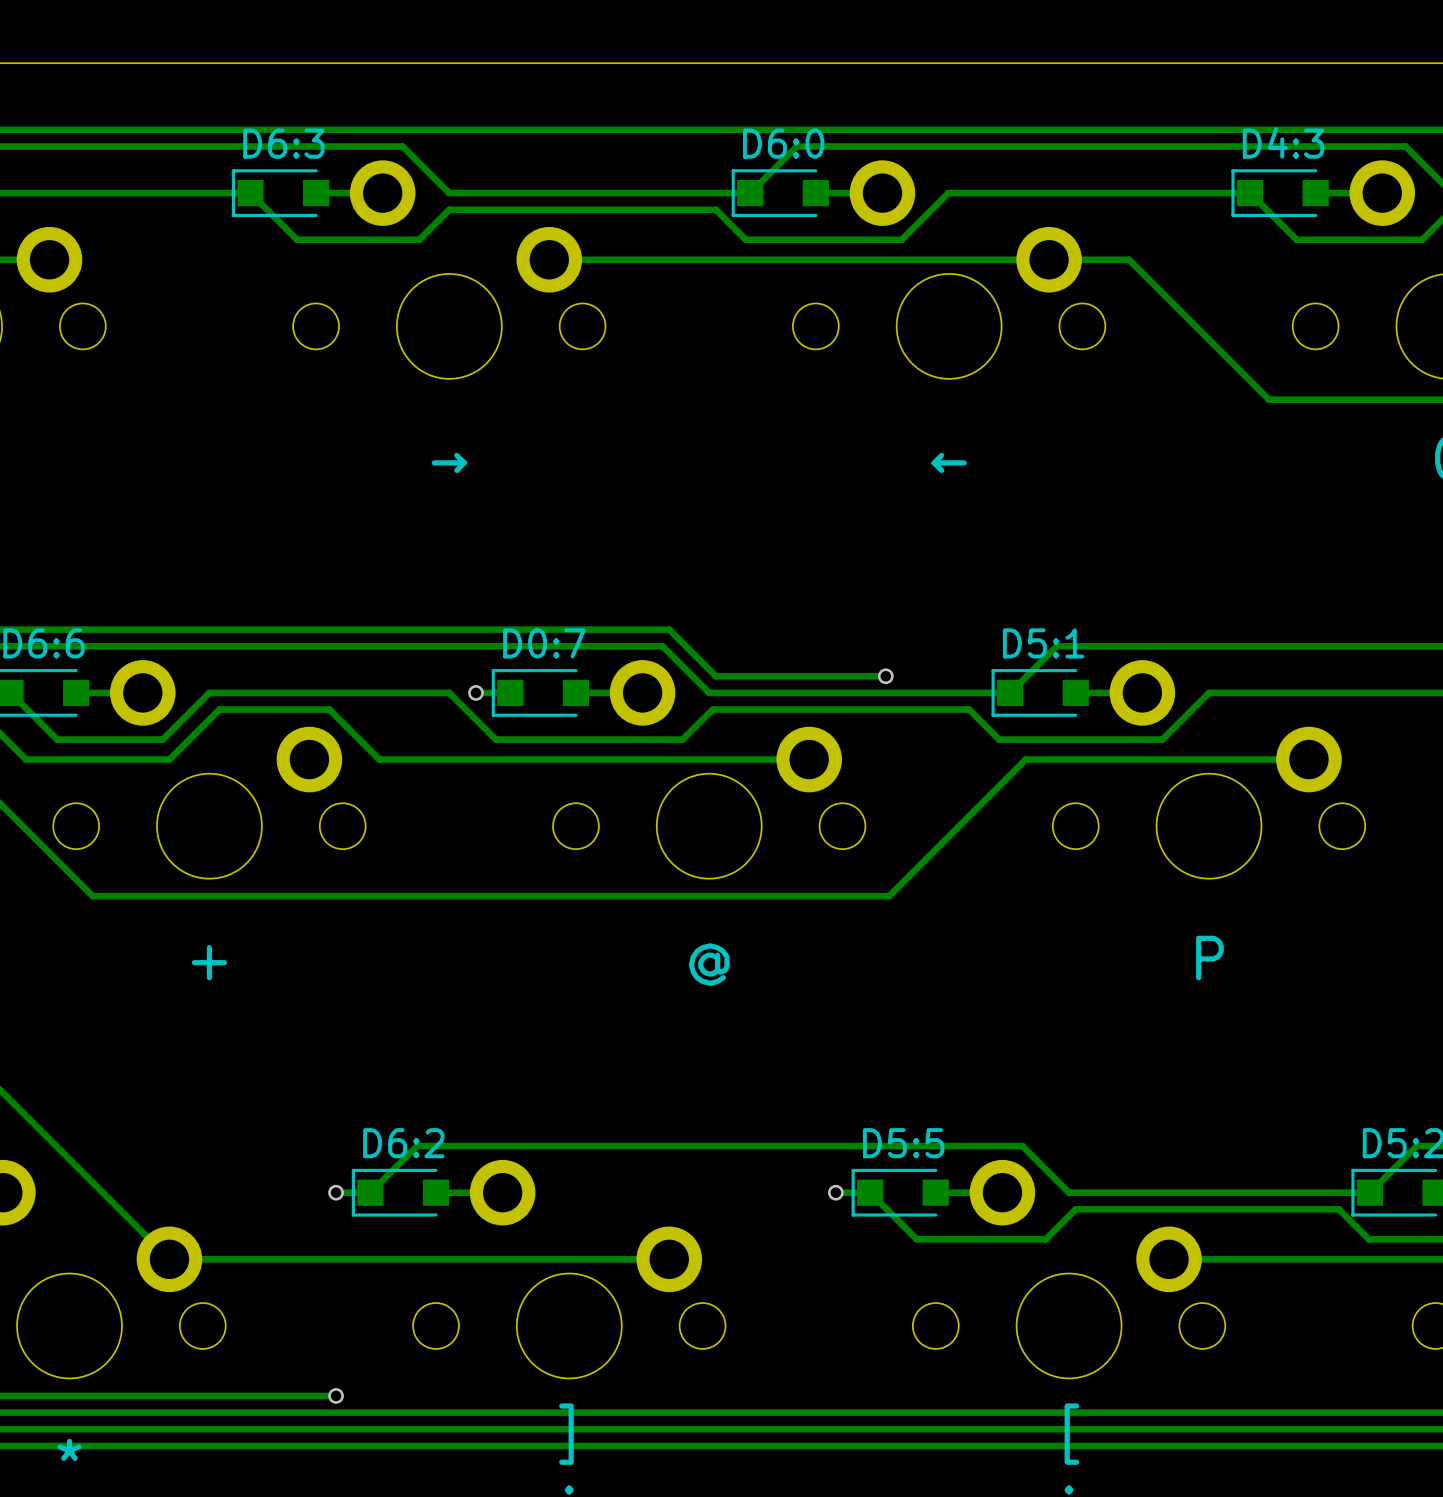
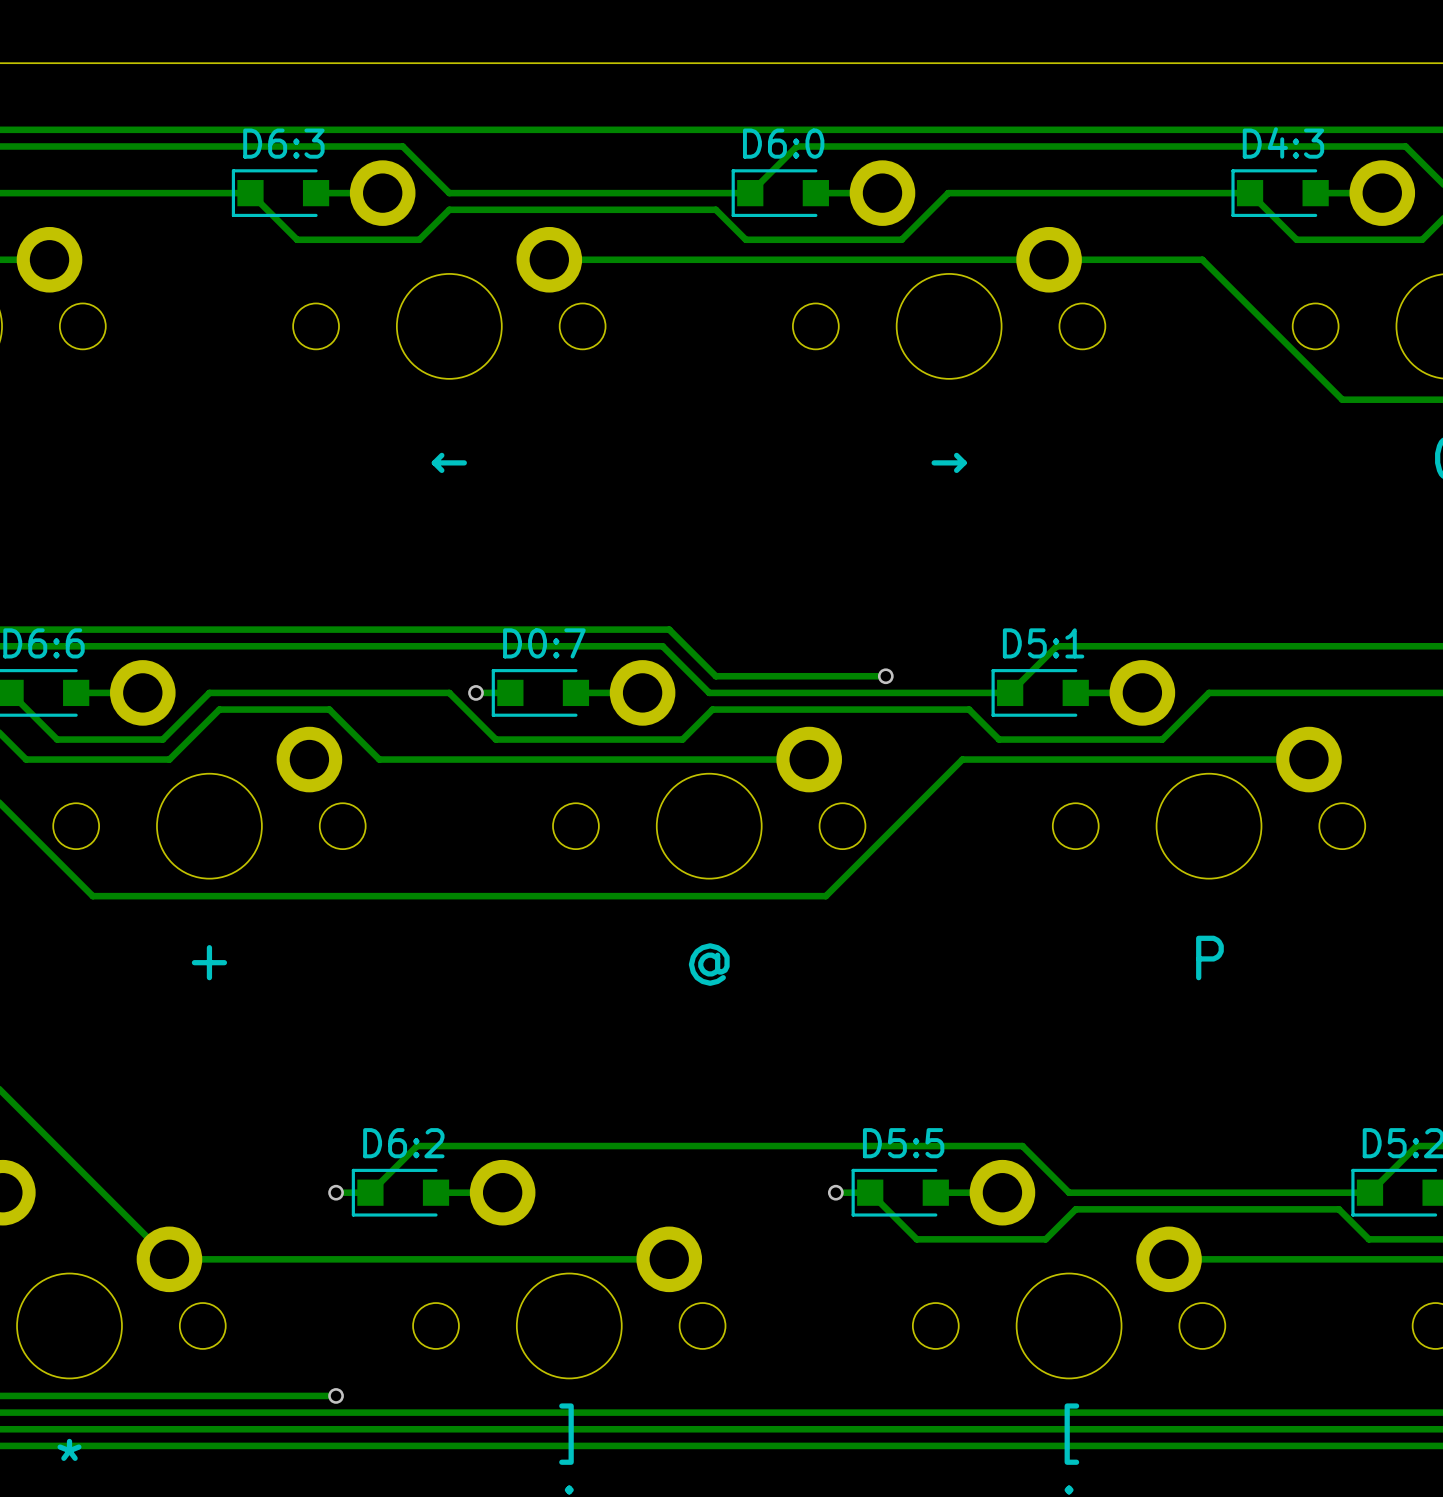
track: (1129, 259) (1268, 399) (1342, 399) -> (1129, 259) (1202, 259) (1342, 399)
text: → (449, 462) -> ← (449, 462)
text: ← (949, 462) -> → (949, 462)
track: (1025, 759) (889, 896) (825, 896) -> (1025, 759) (962, 759) (825, 896)

